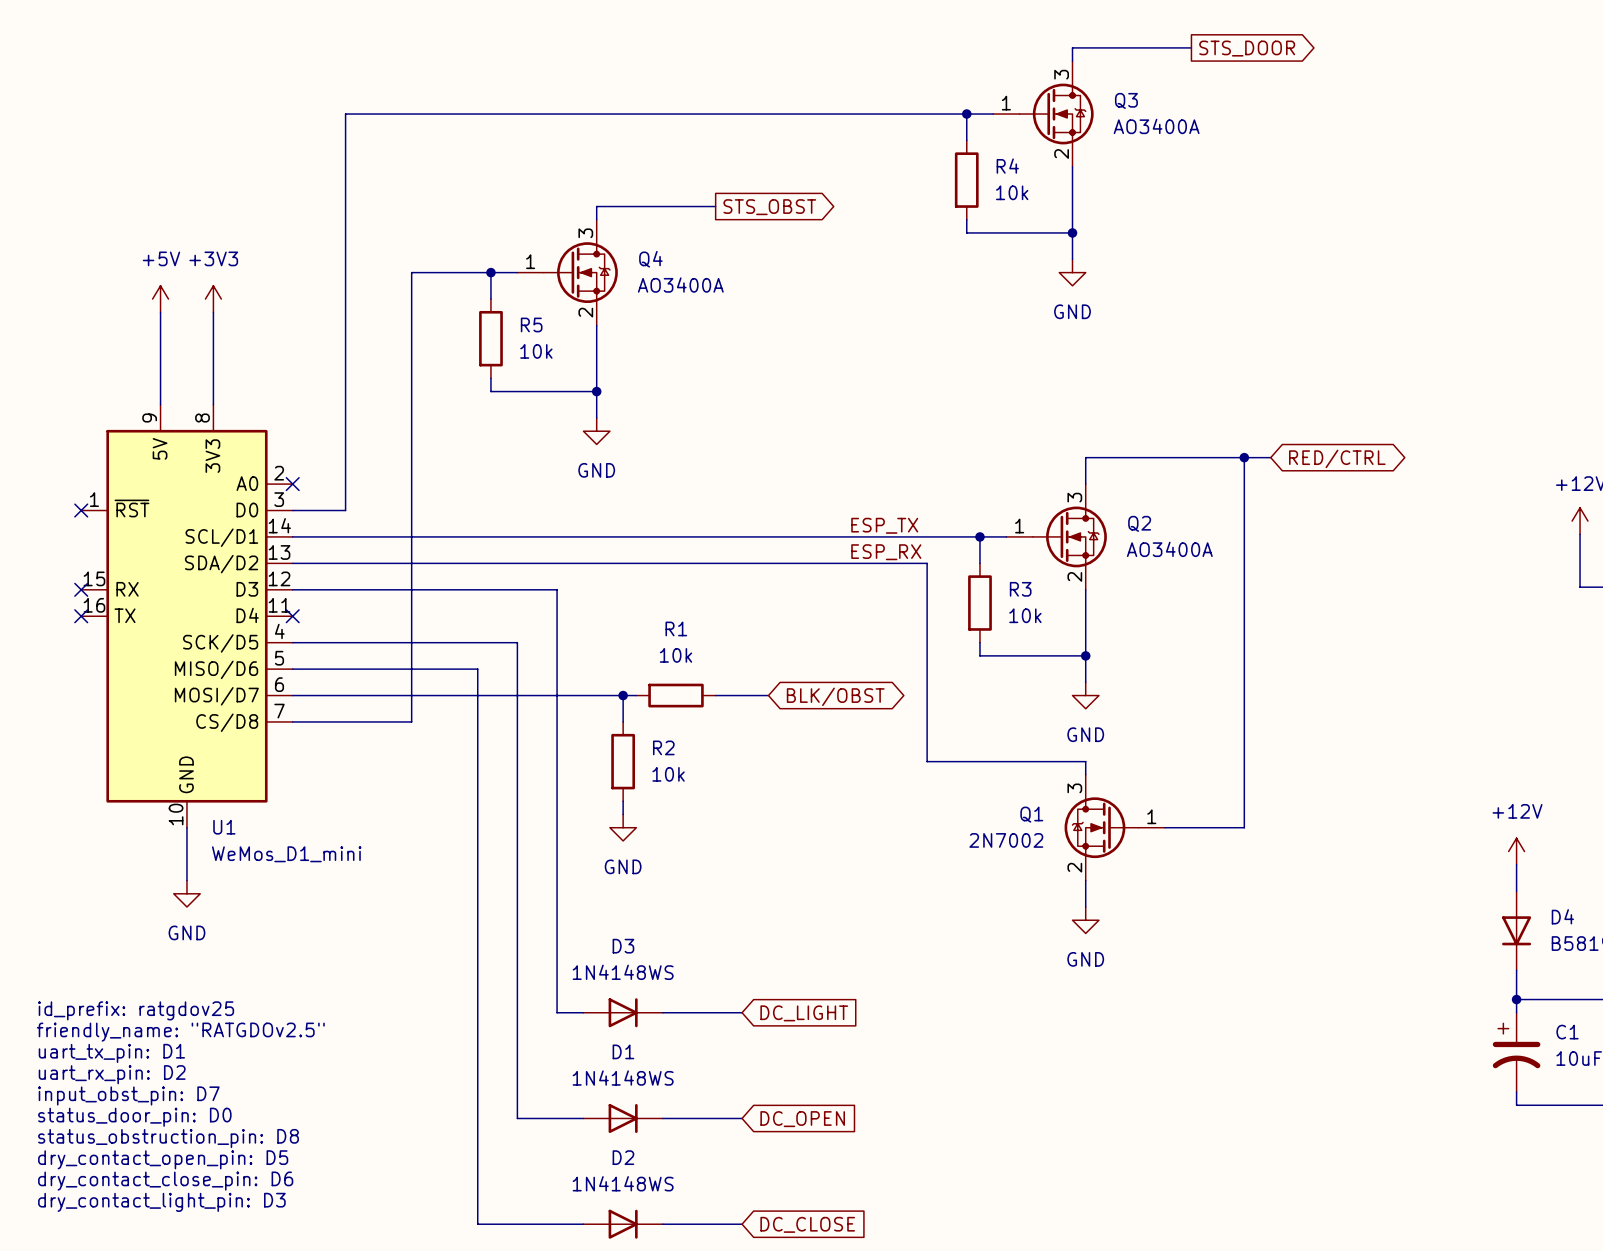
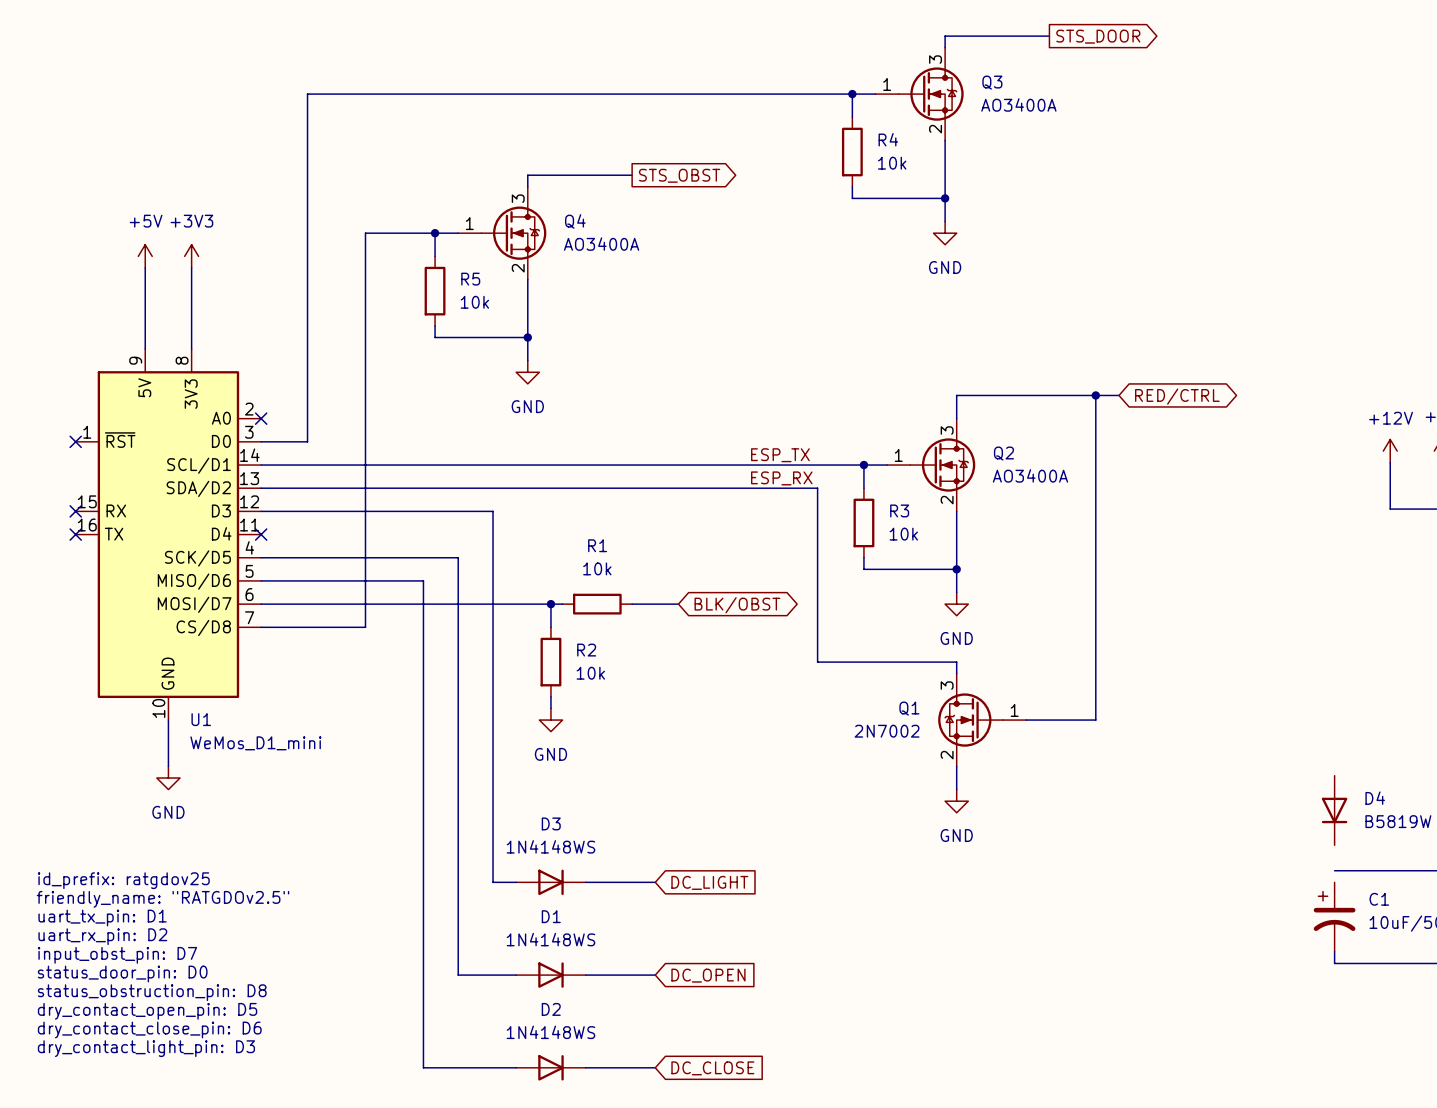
power symbol: +12V (1516, 851) -> none
wire: (1516, 864) (1516, 891) -> none
wire: (1516, 970) (1516, 1012) -> none
junction: (1516, 999) -> none

